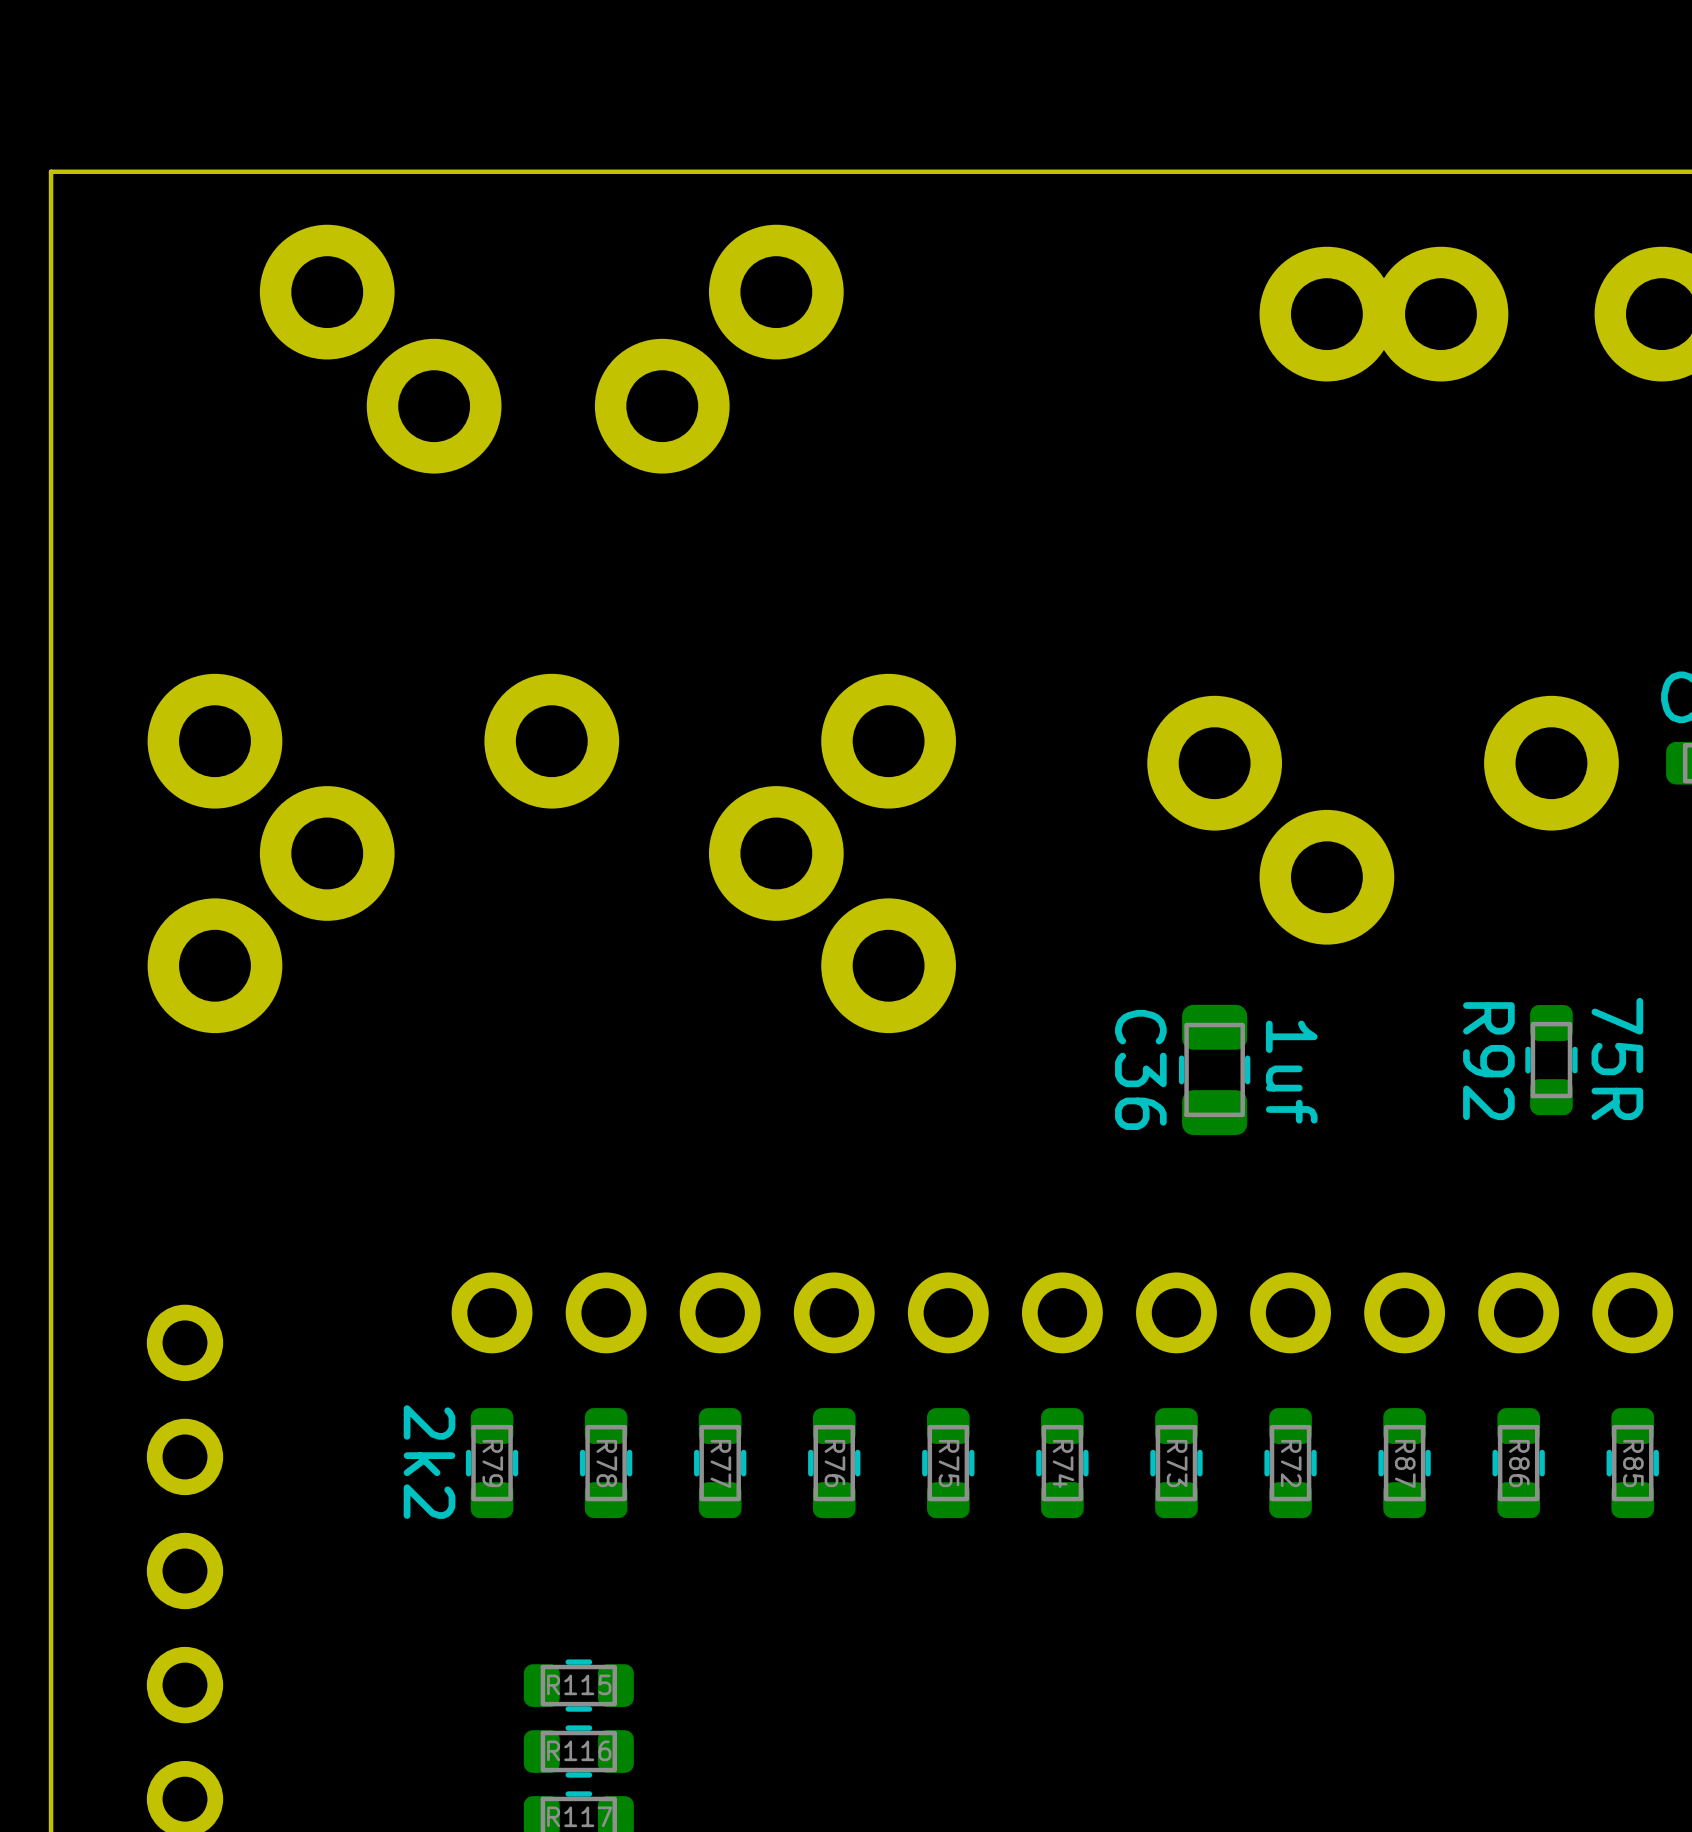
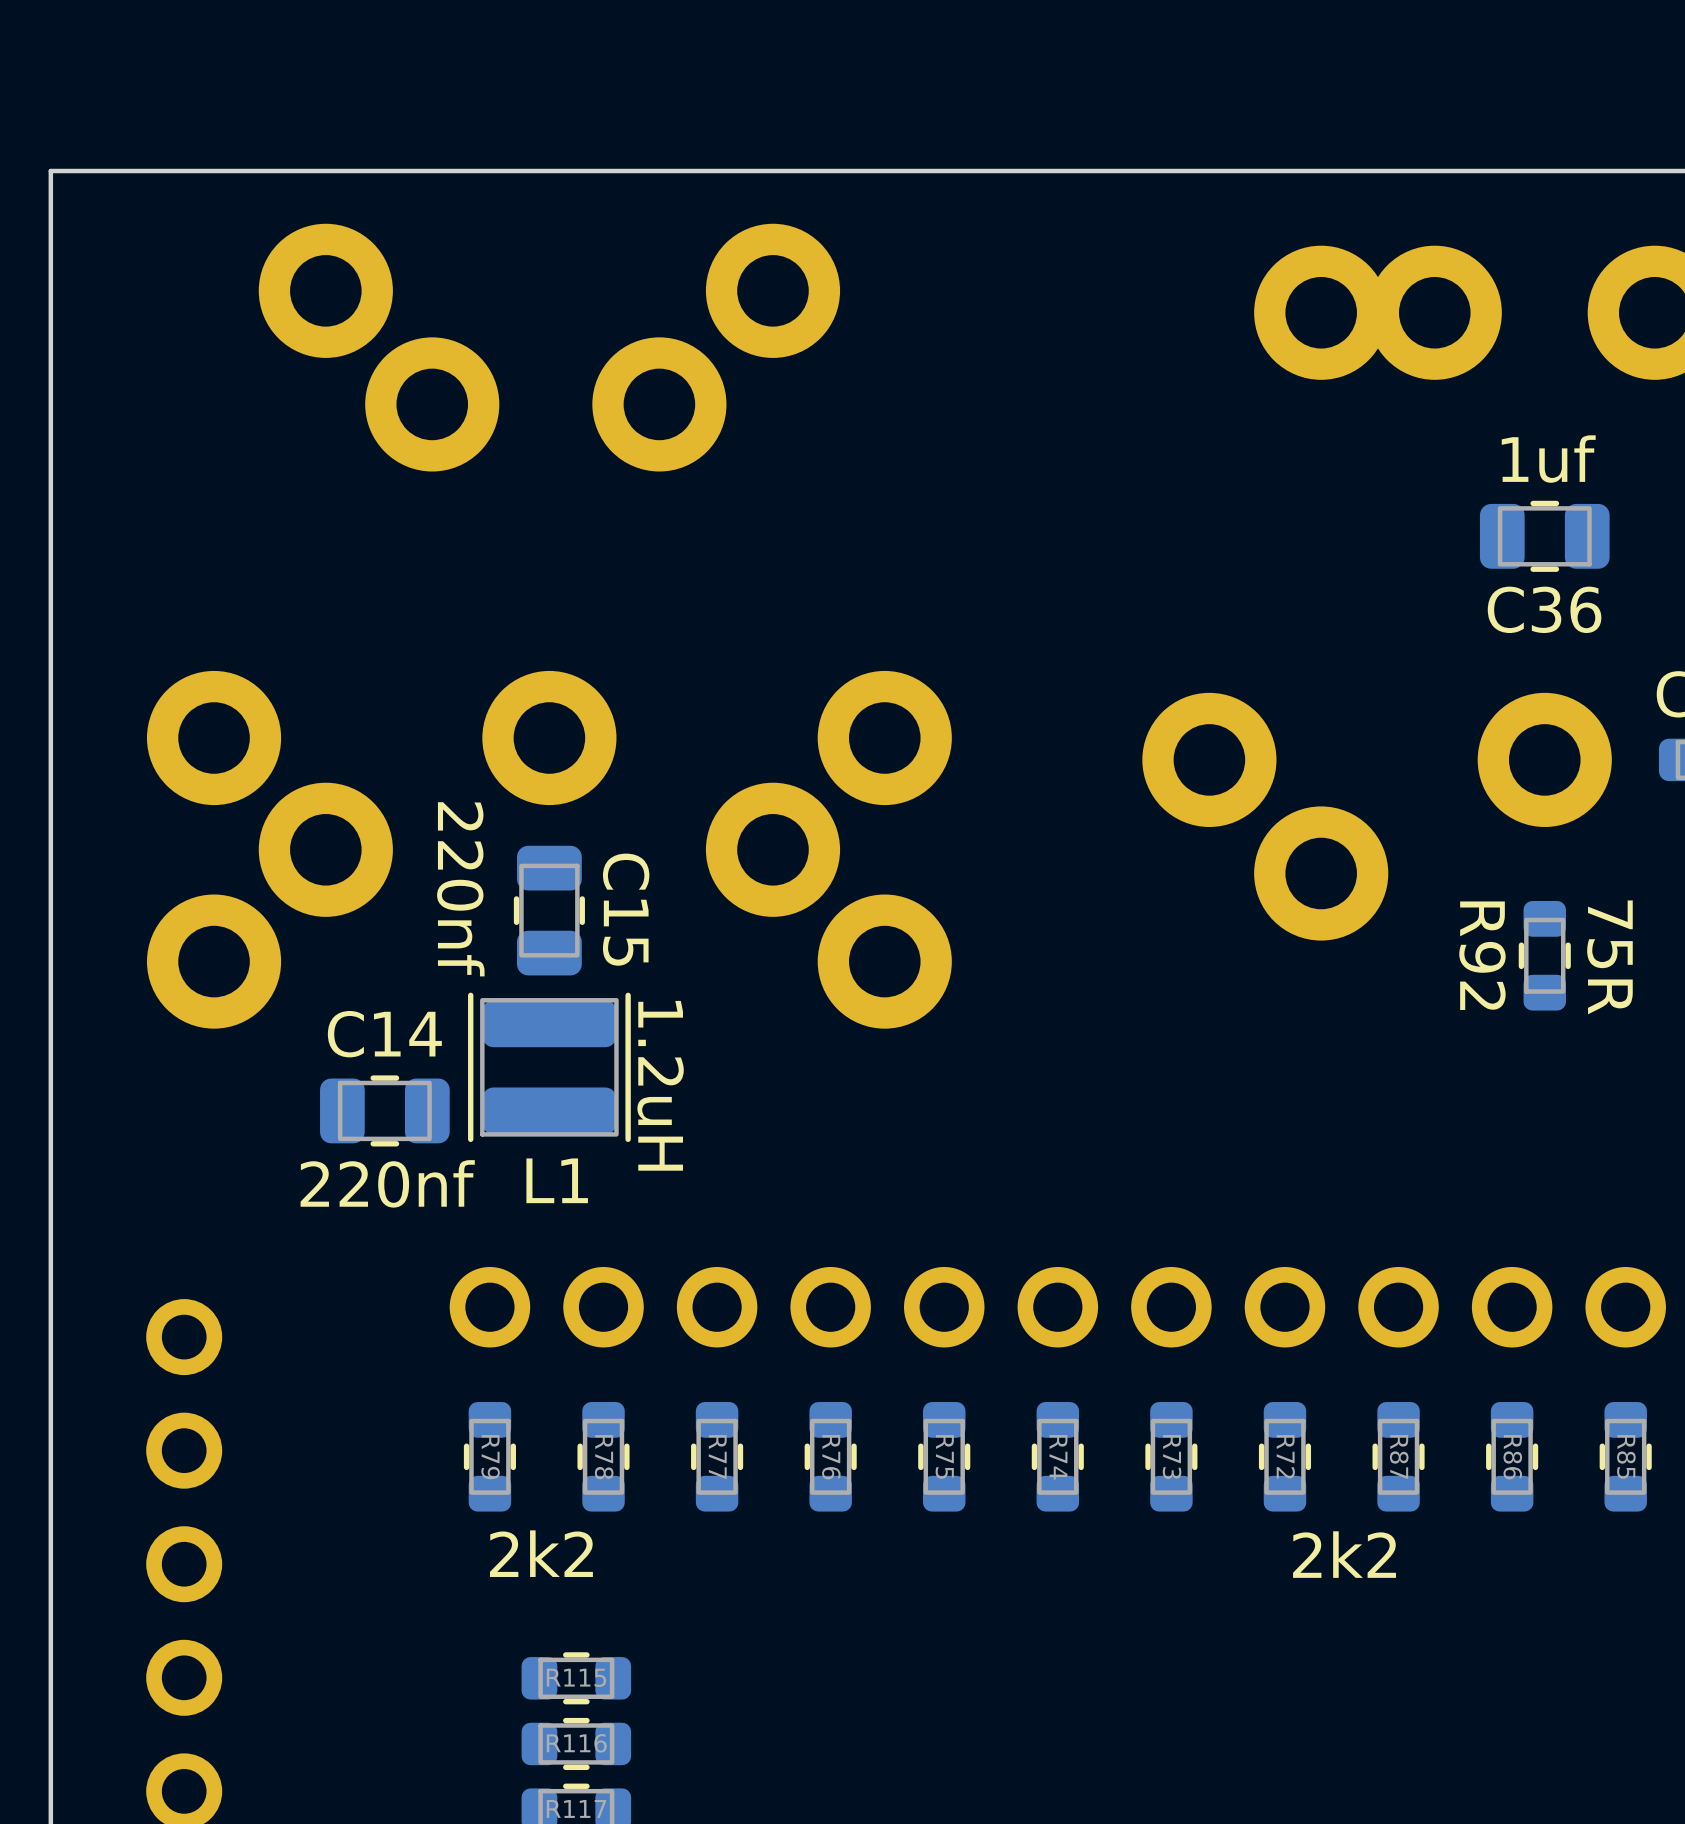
C15: none -> 220nf (549, 910)
R92 position: (1551, 1060) -> (1544, 955)
C36 name position: C36 (1140, 1069) -> C36 (1544, 609)
C36 rotation: 0° (1214, 1069) -> 90° clockwise (1544, 536)
C36 position: (1214, 1069) -> (1544, 536)
L1: none -> 1.2uH (549, 1067)
C36 value position: 1uf (1291, 1072) -> 1uf (1548, 459)
C14: none -> 220nf (384, 1110)
R79 value rotation: 0° (429, 1462) -> 90° counterclockwise (541, 1553)
R79 value position: 2k2 (429, 1462) -> 2k2 (541, 1553)
R85 value: none -> 2k2 (1344, 1554)

